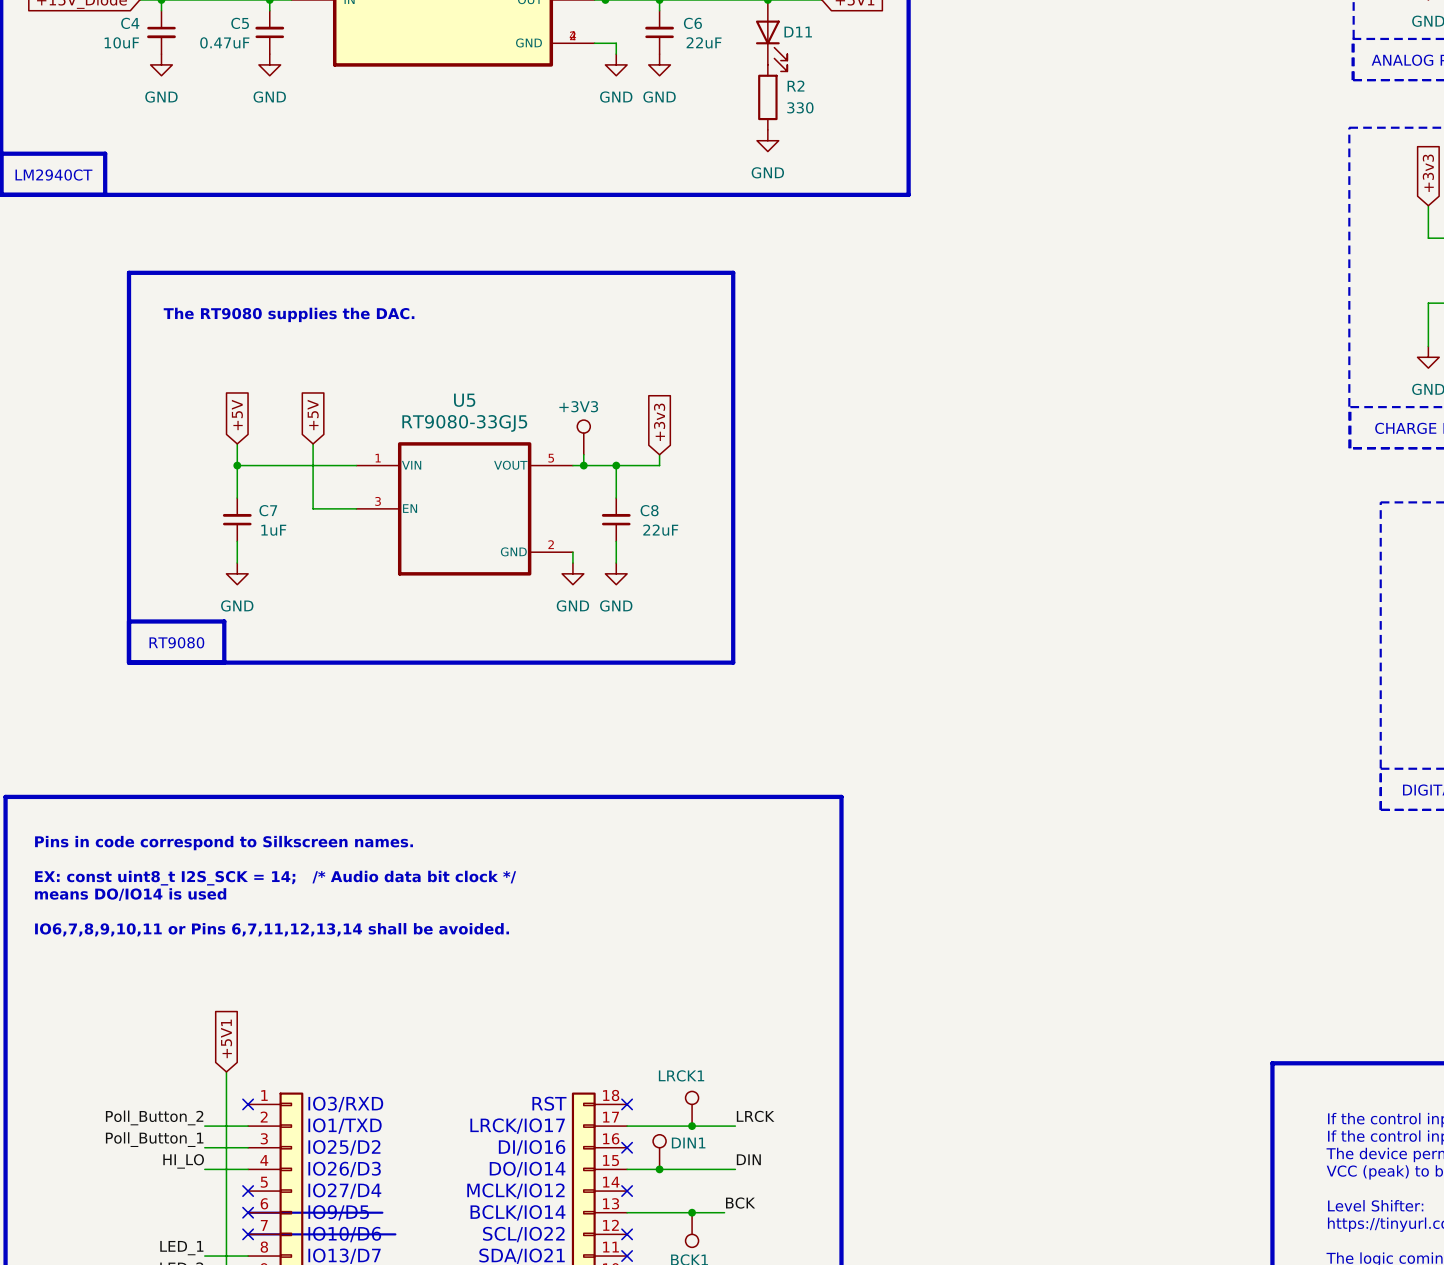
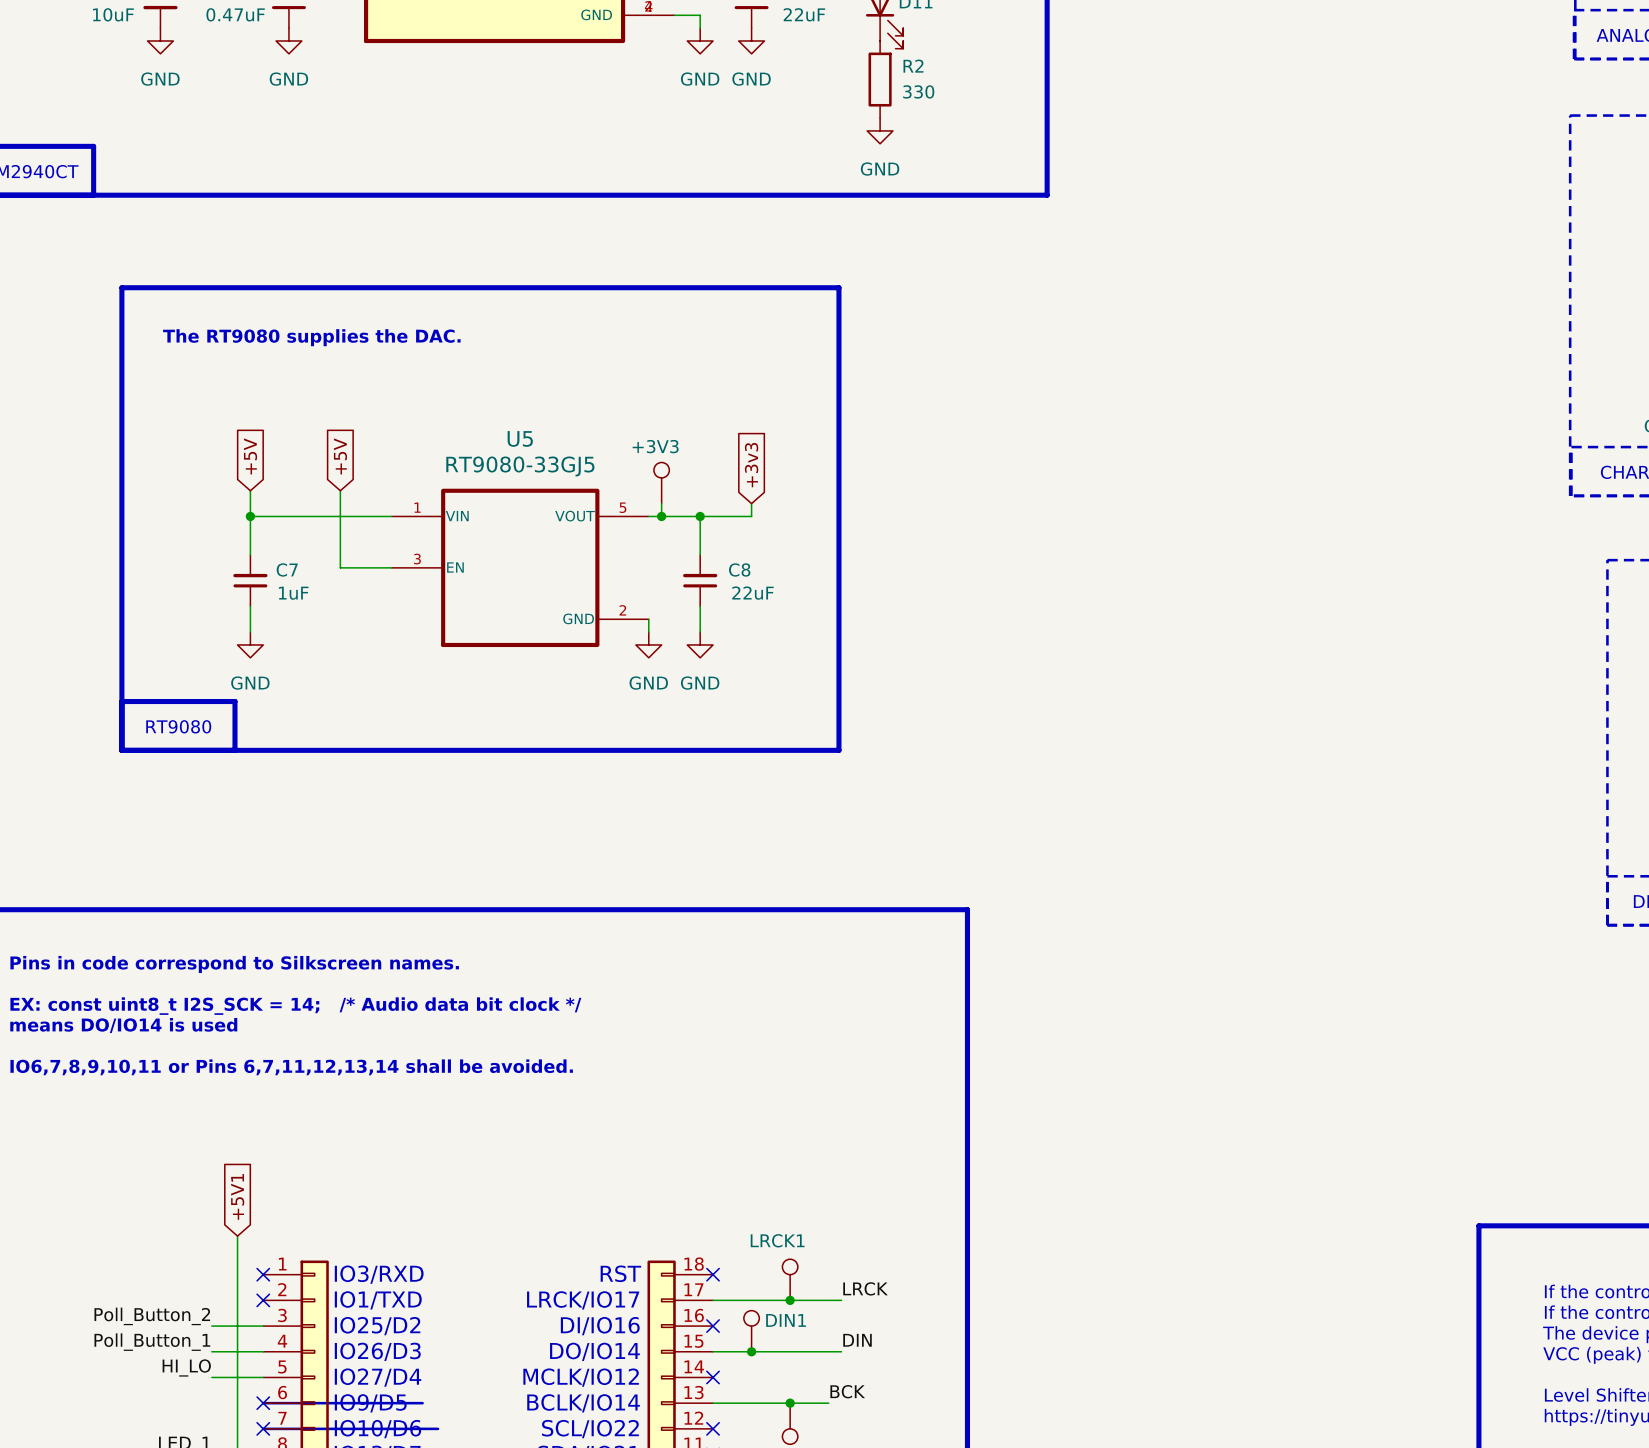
label: Poll_Button_2 (154, 1117) -> none
wire: (204, 1126) (248, 1126) -> (211, 1377) (263, 1377)
no-connect mark: none -> (263, 1300)
label: Poll_Button_1 (154, 1139) -> Poll_Button_2 (152, 1316)
label: HI_LO (183, 1161) -> Poll_Button_1 (152, 1342)
label: none -> HI_LO (186, 1367)
no-connect mark: (248, 1191) -> none

